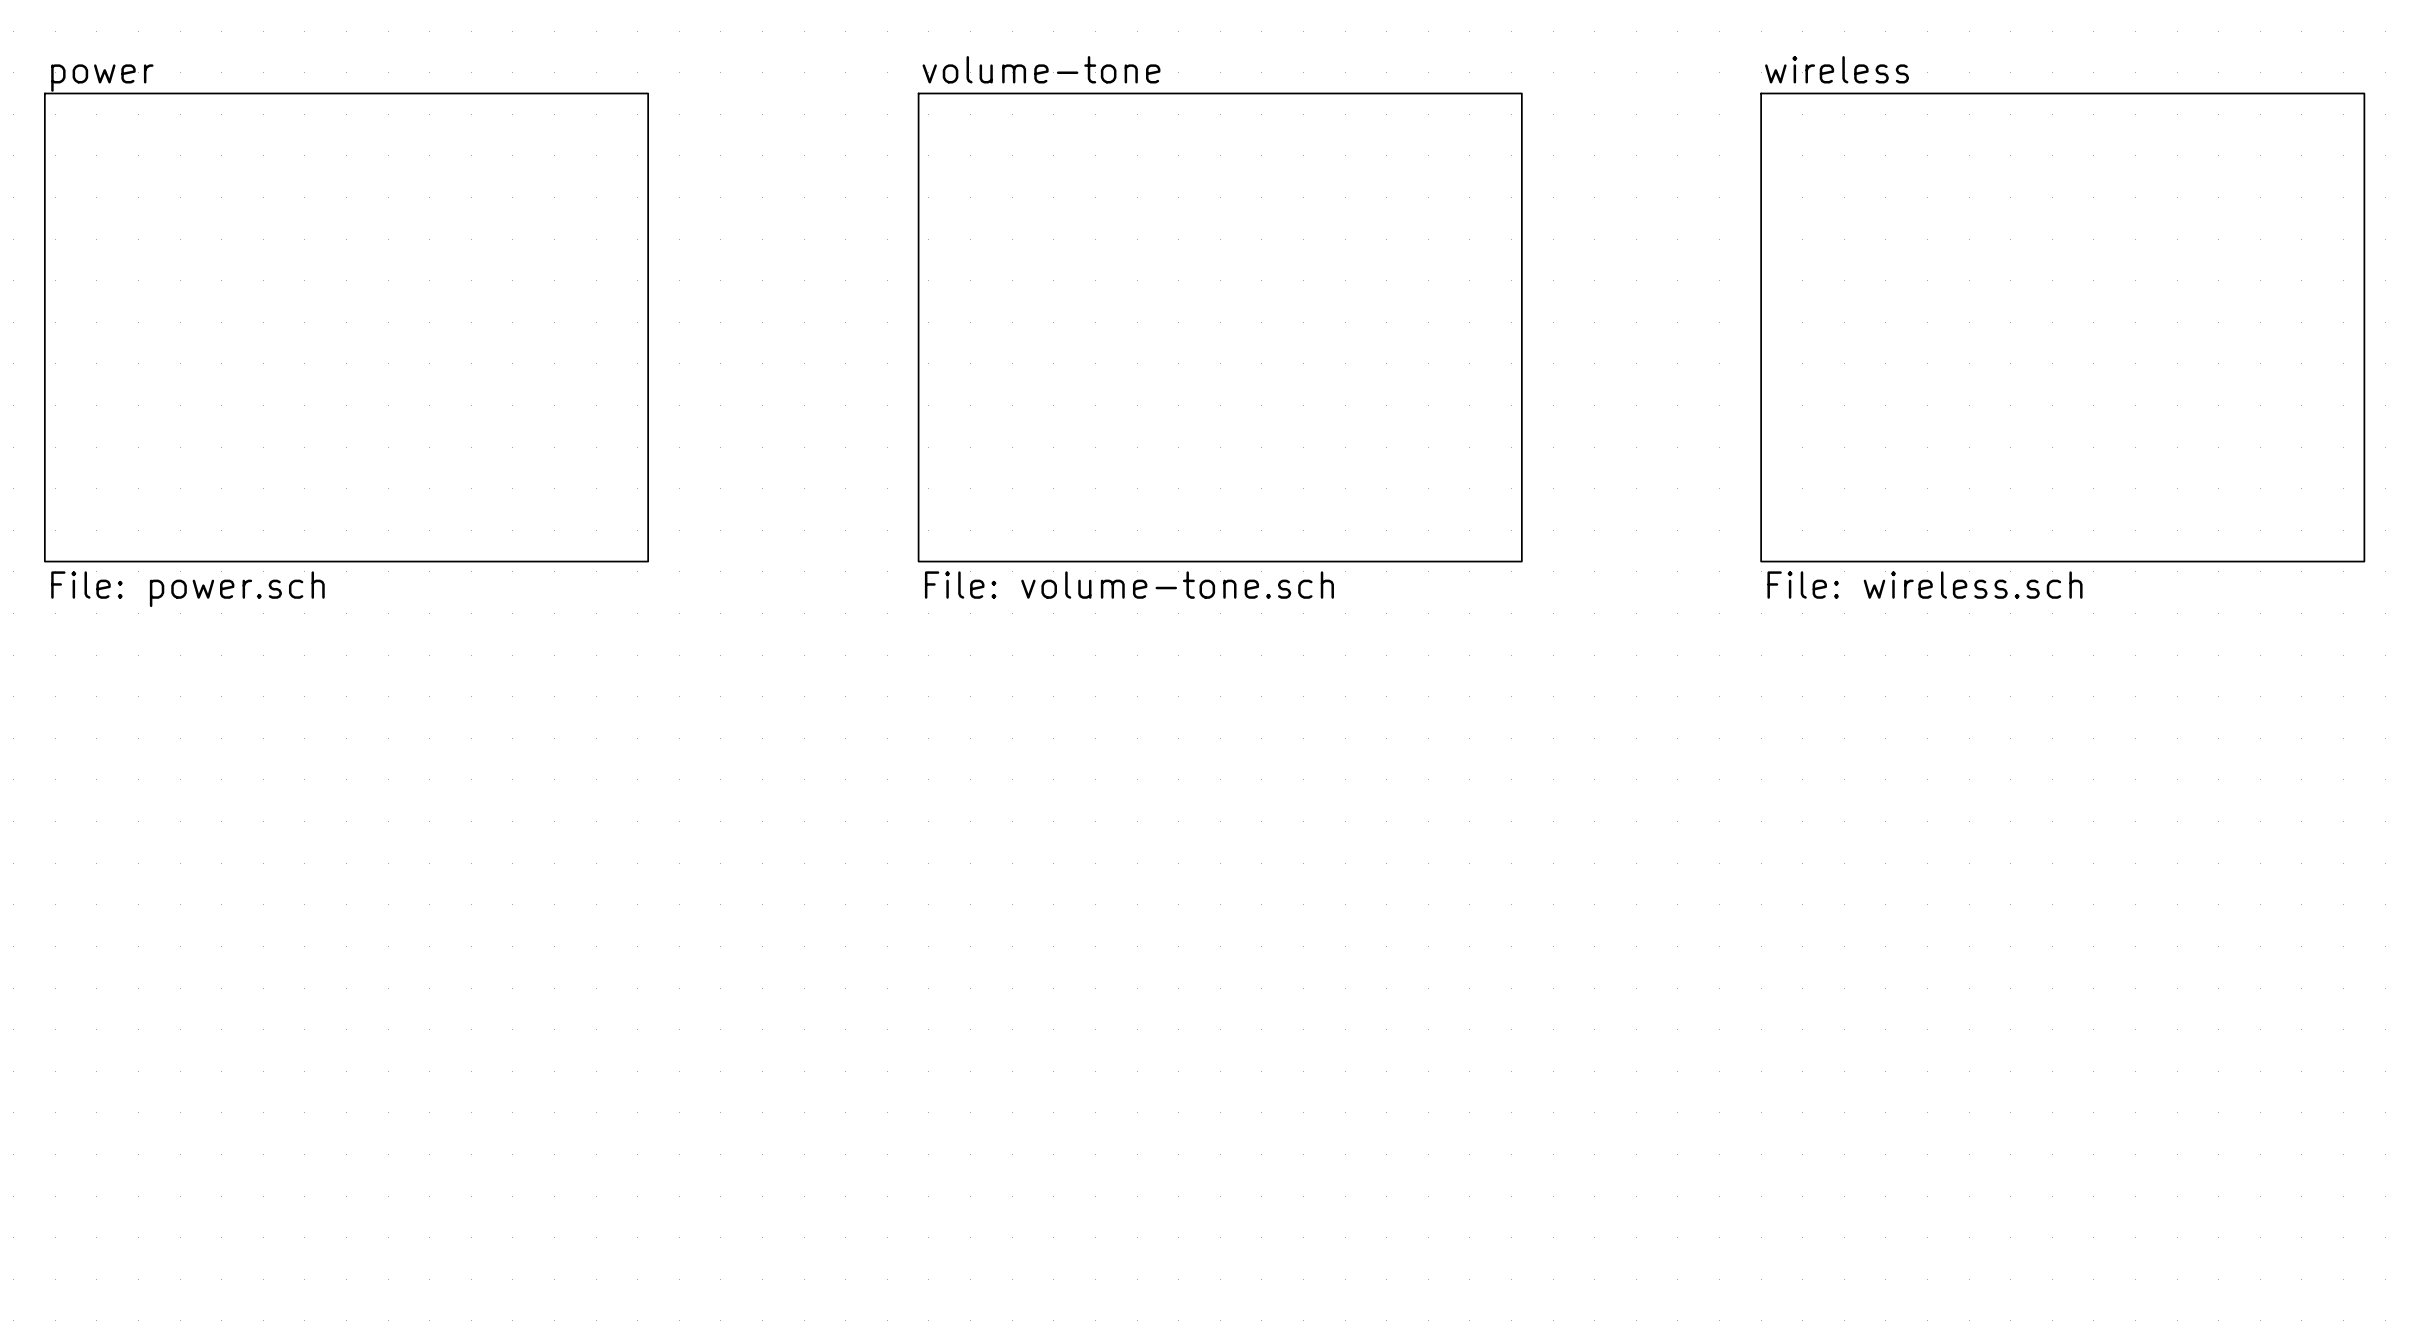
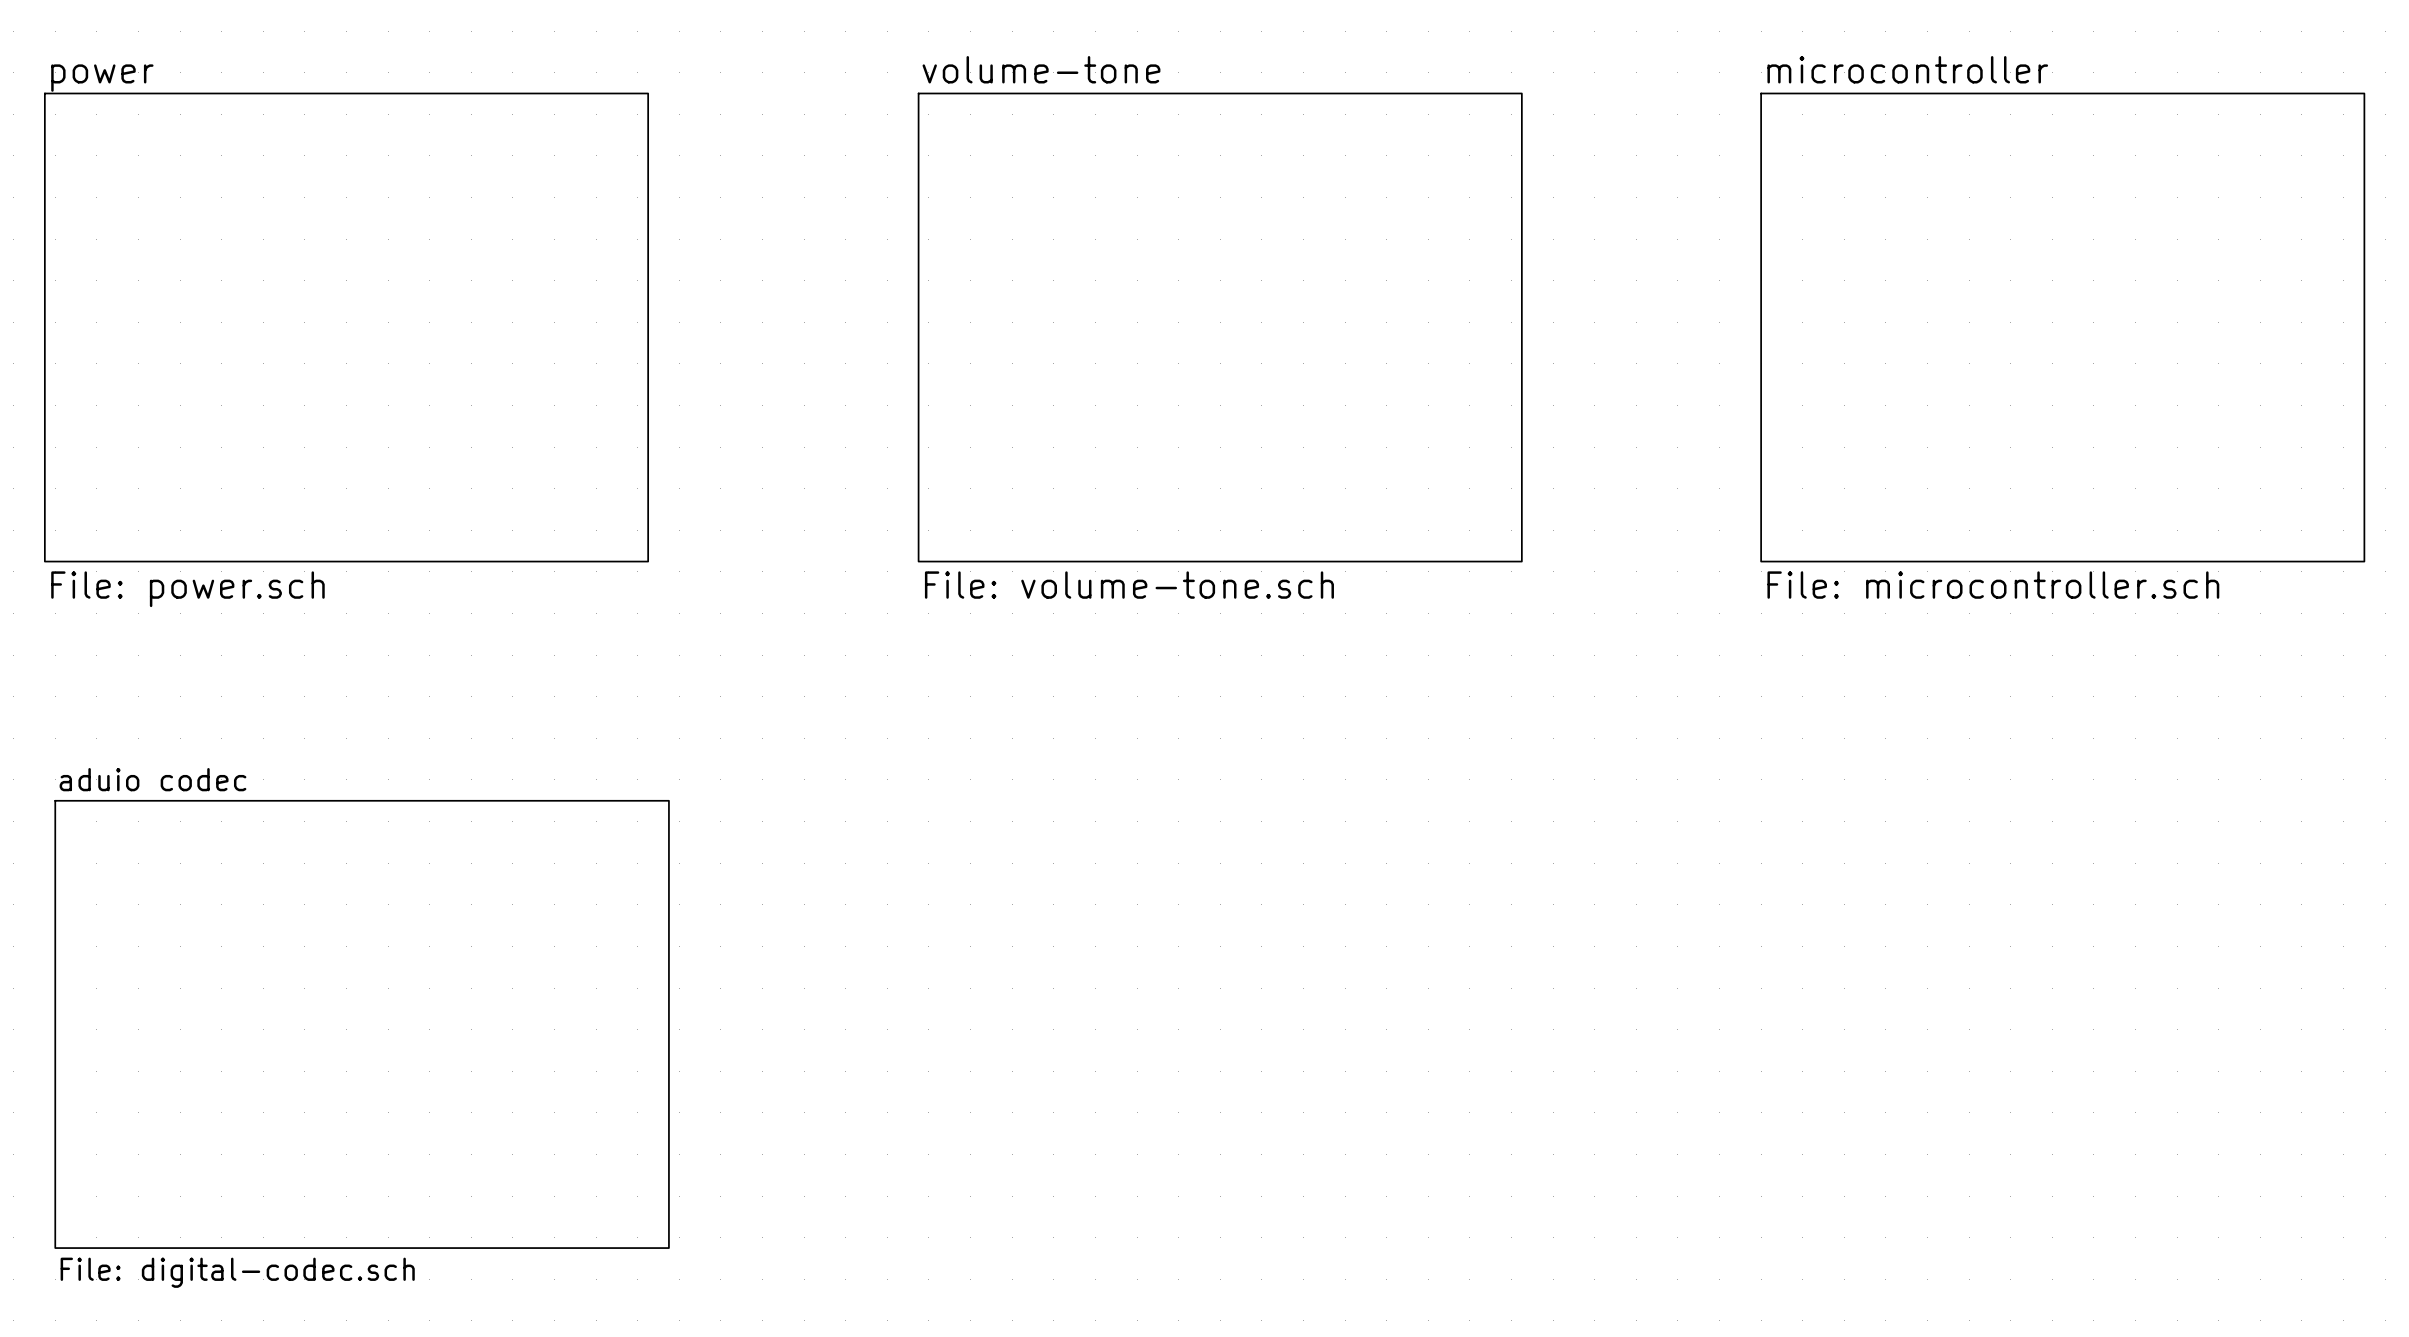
sheet wireless name: wireless (1837, 69) -> microcontroller (1907, 69)
sheet wireless value: File: wireless.sch (1925, 585) -> File: microcontroller.sch (1993, 585)
sheet aduio codec: none -> File: digital-codec.sch (362, 1024)

